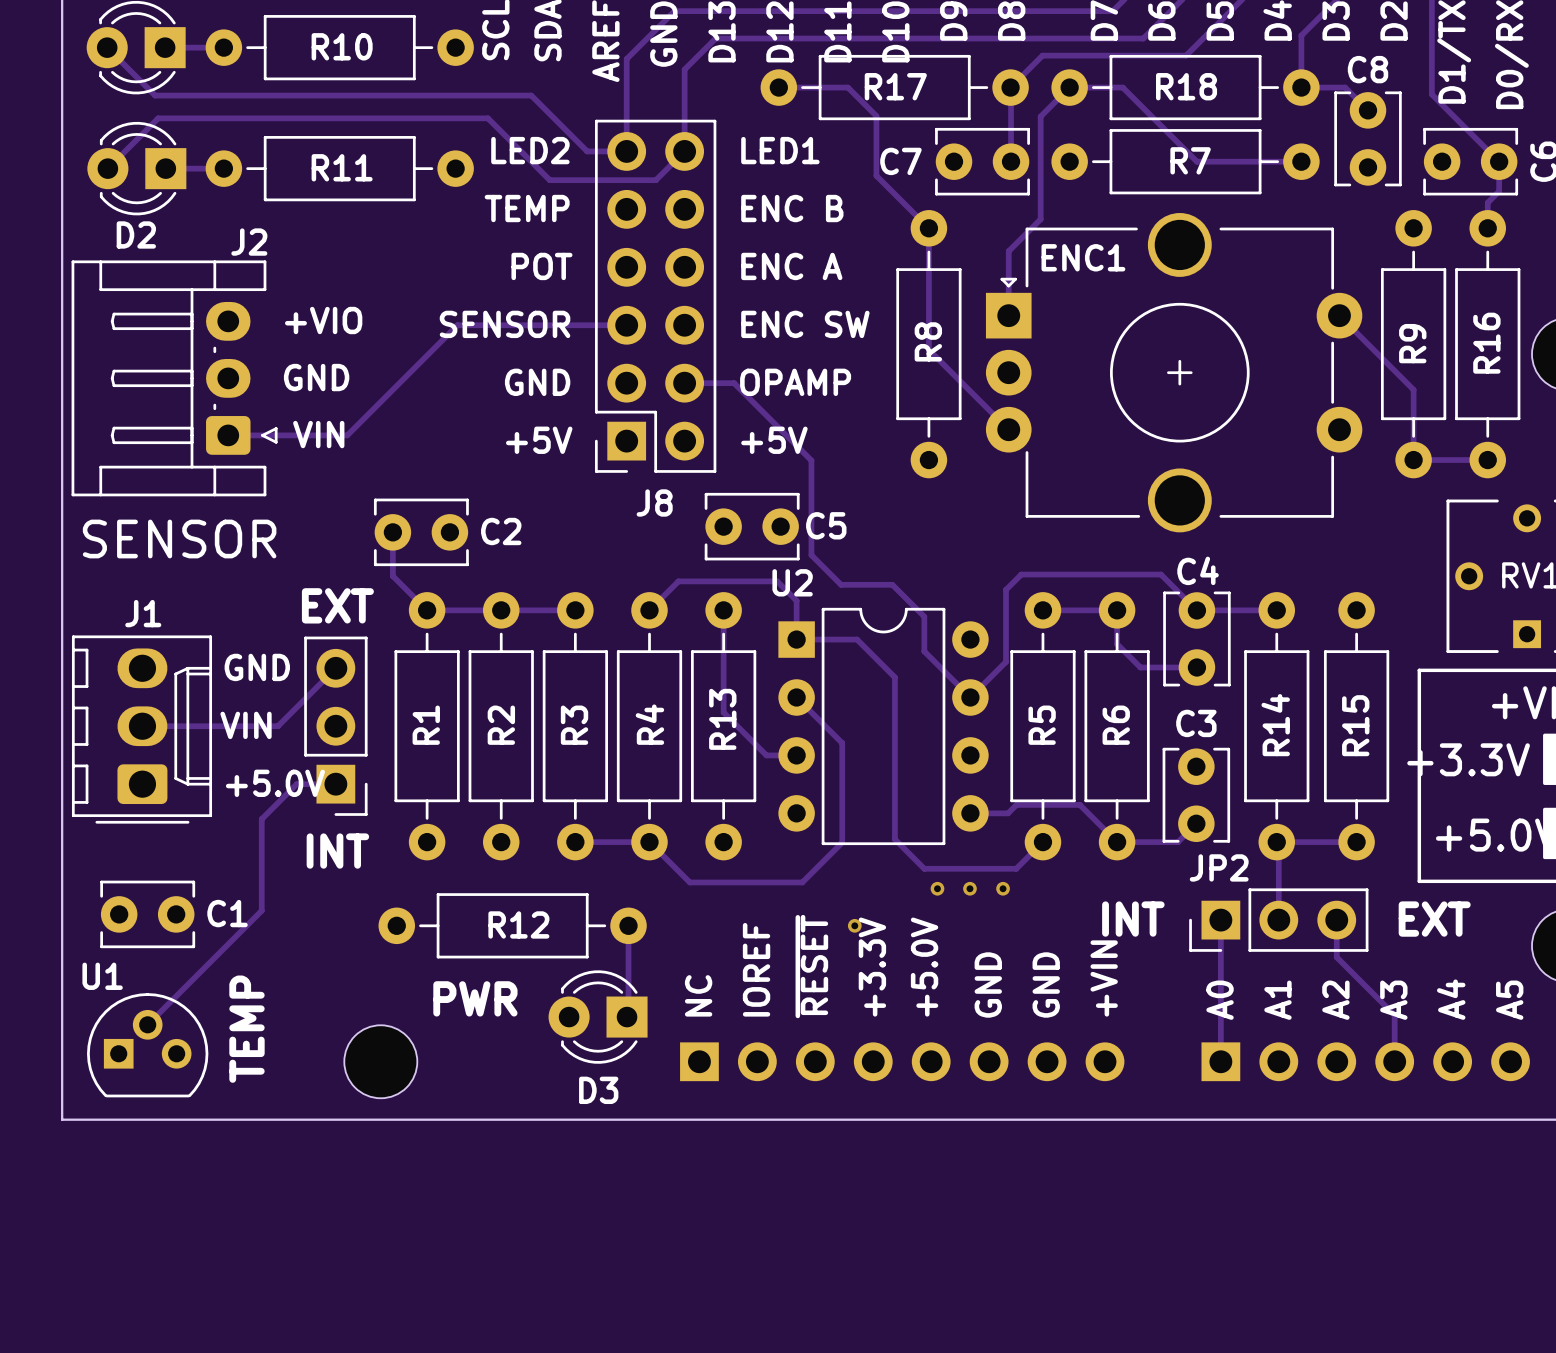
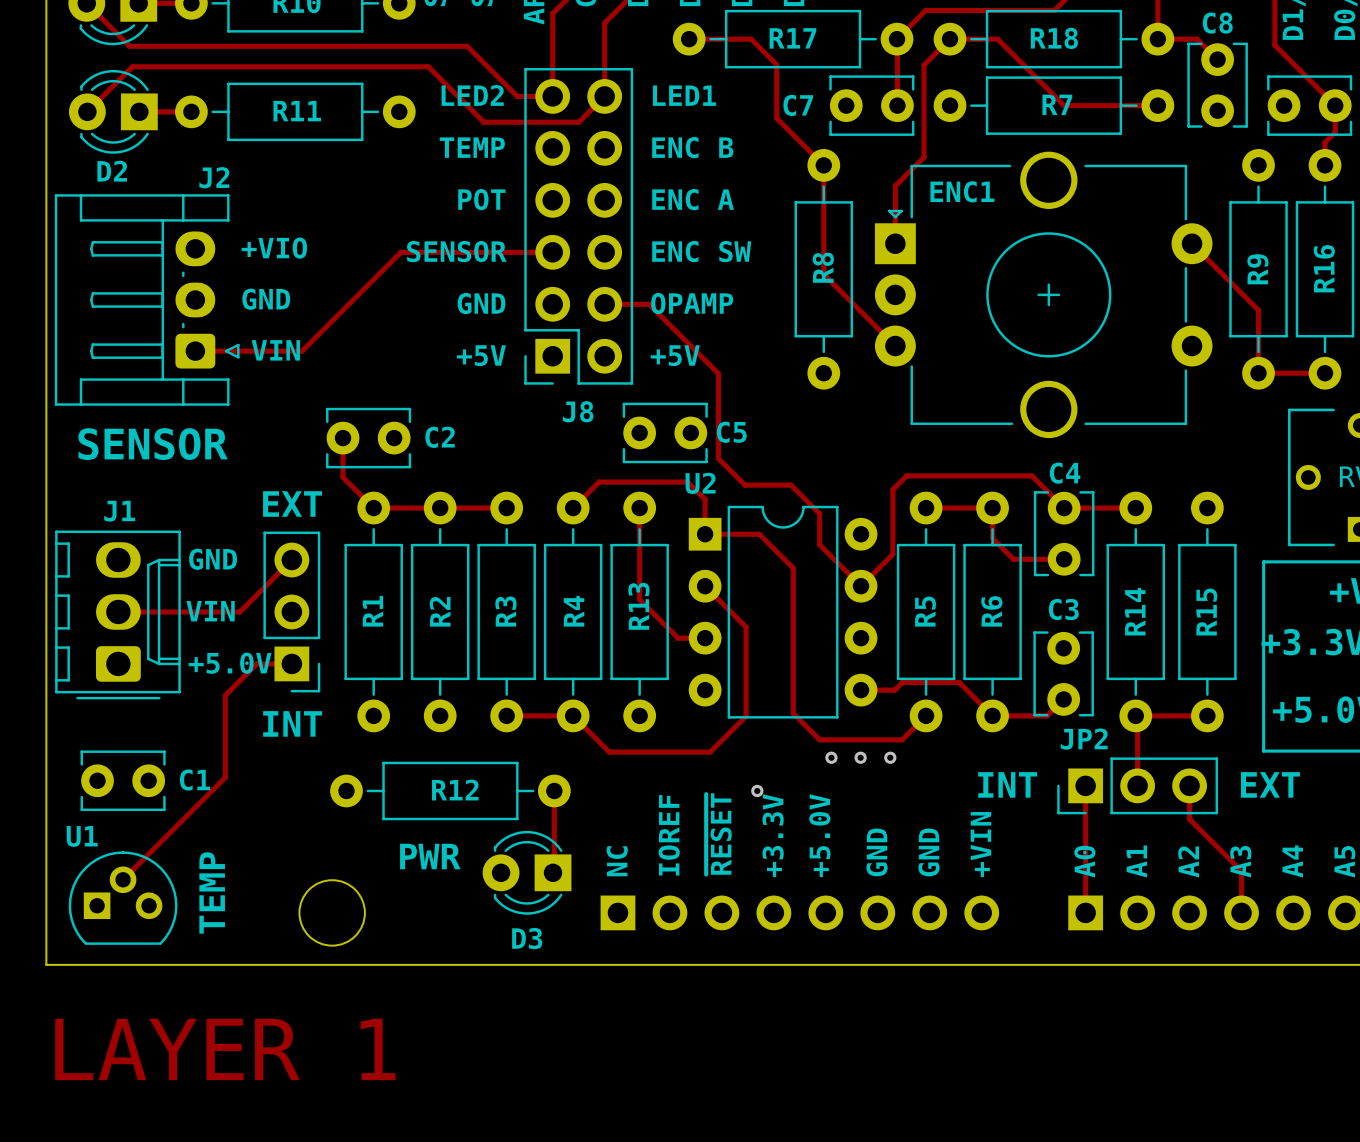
text: none -> LAYER 1 (225, 1049)

